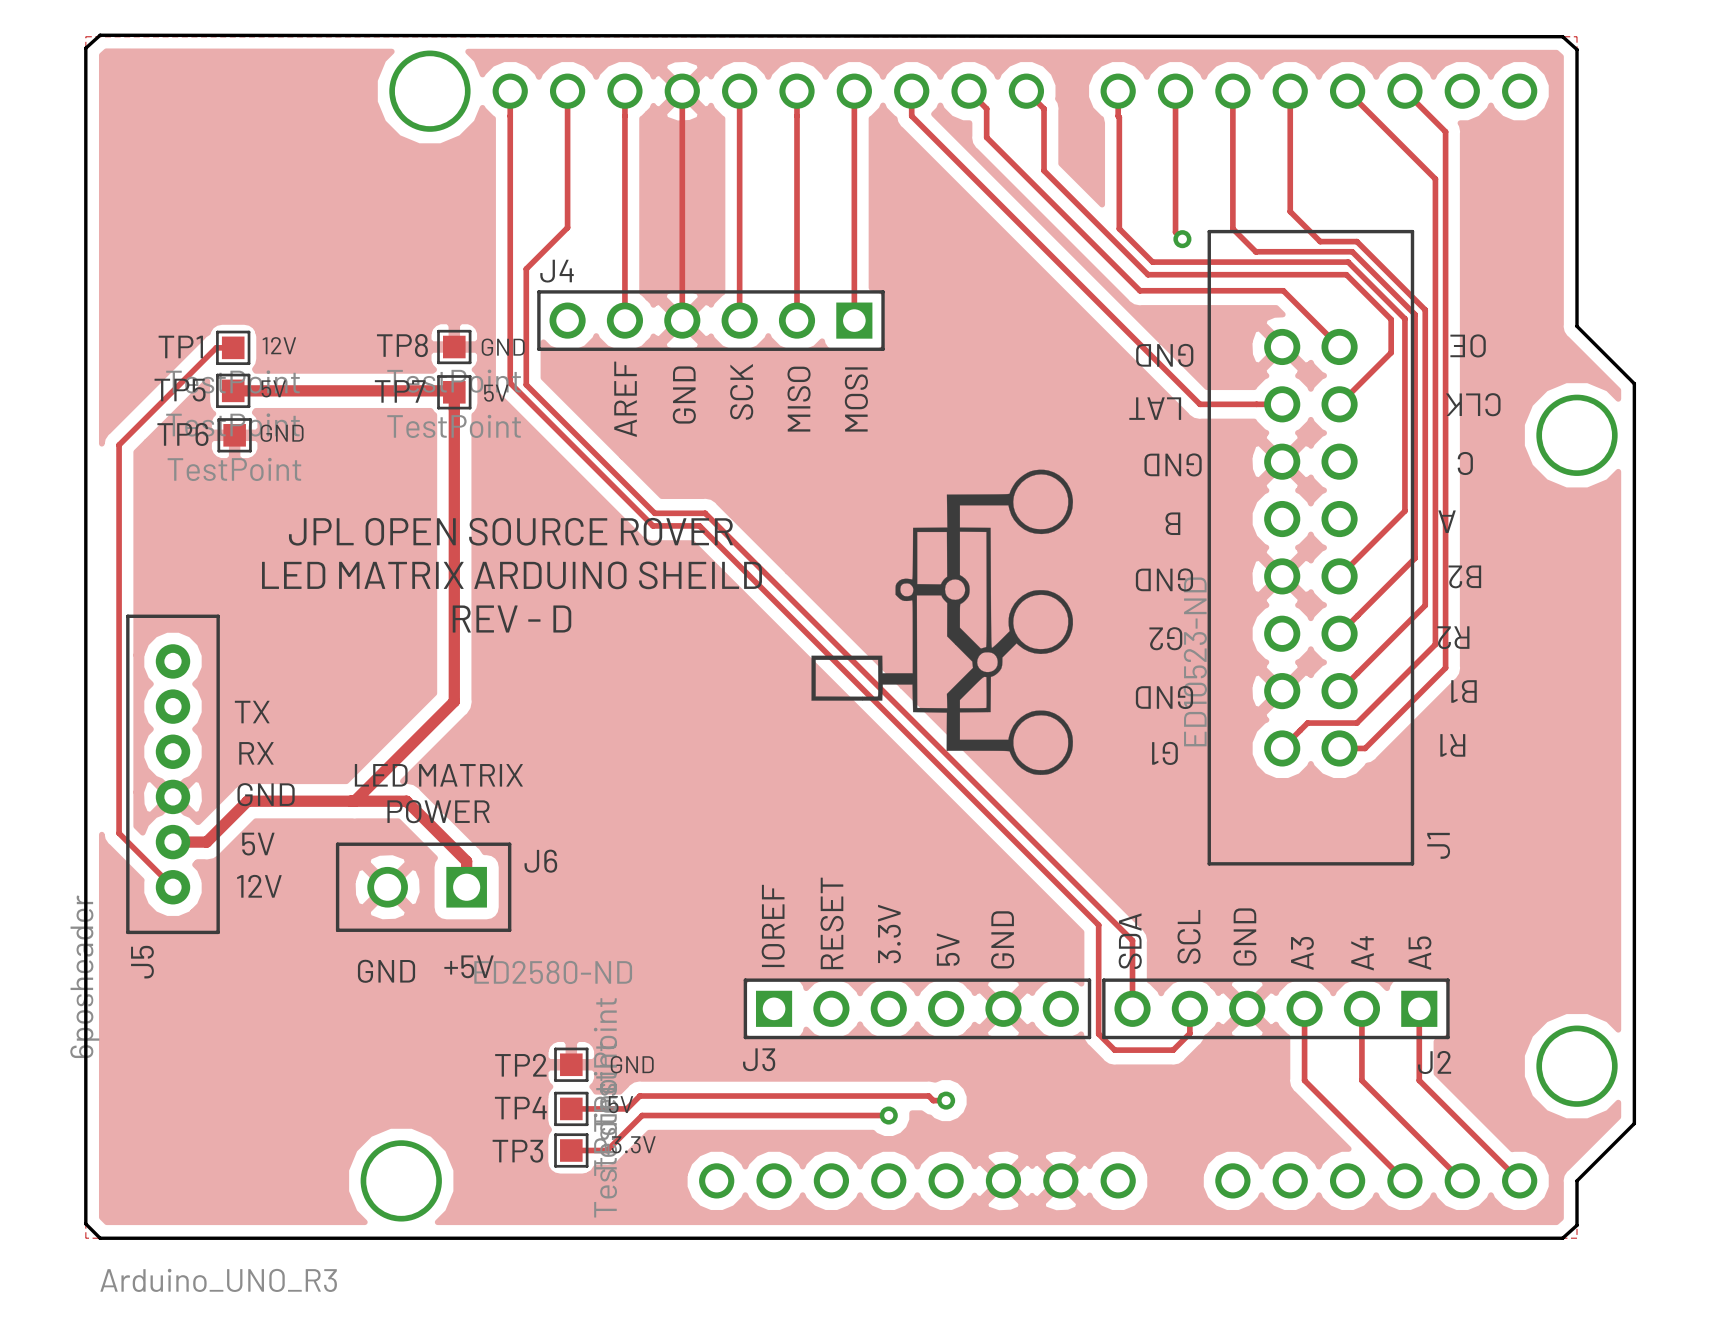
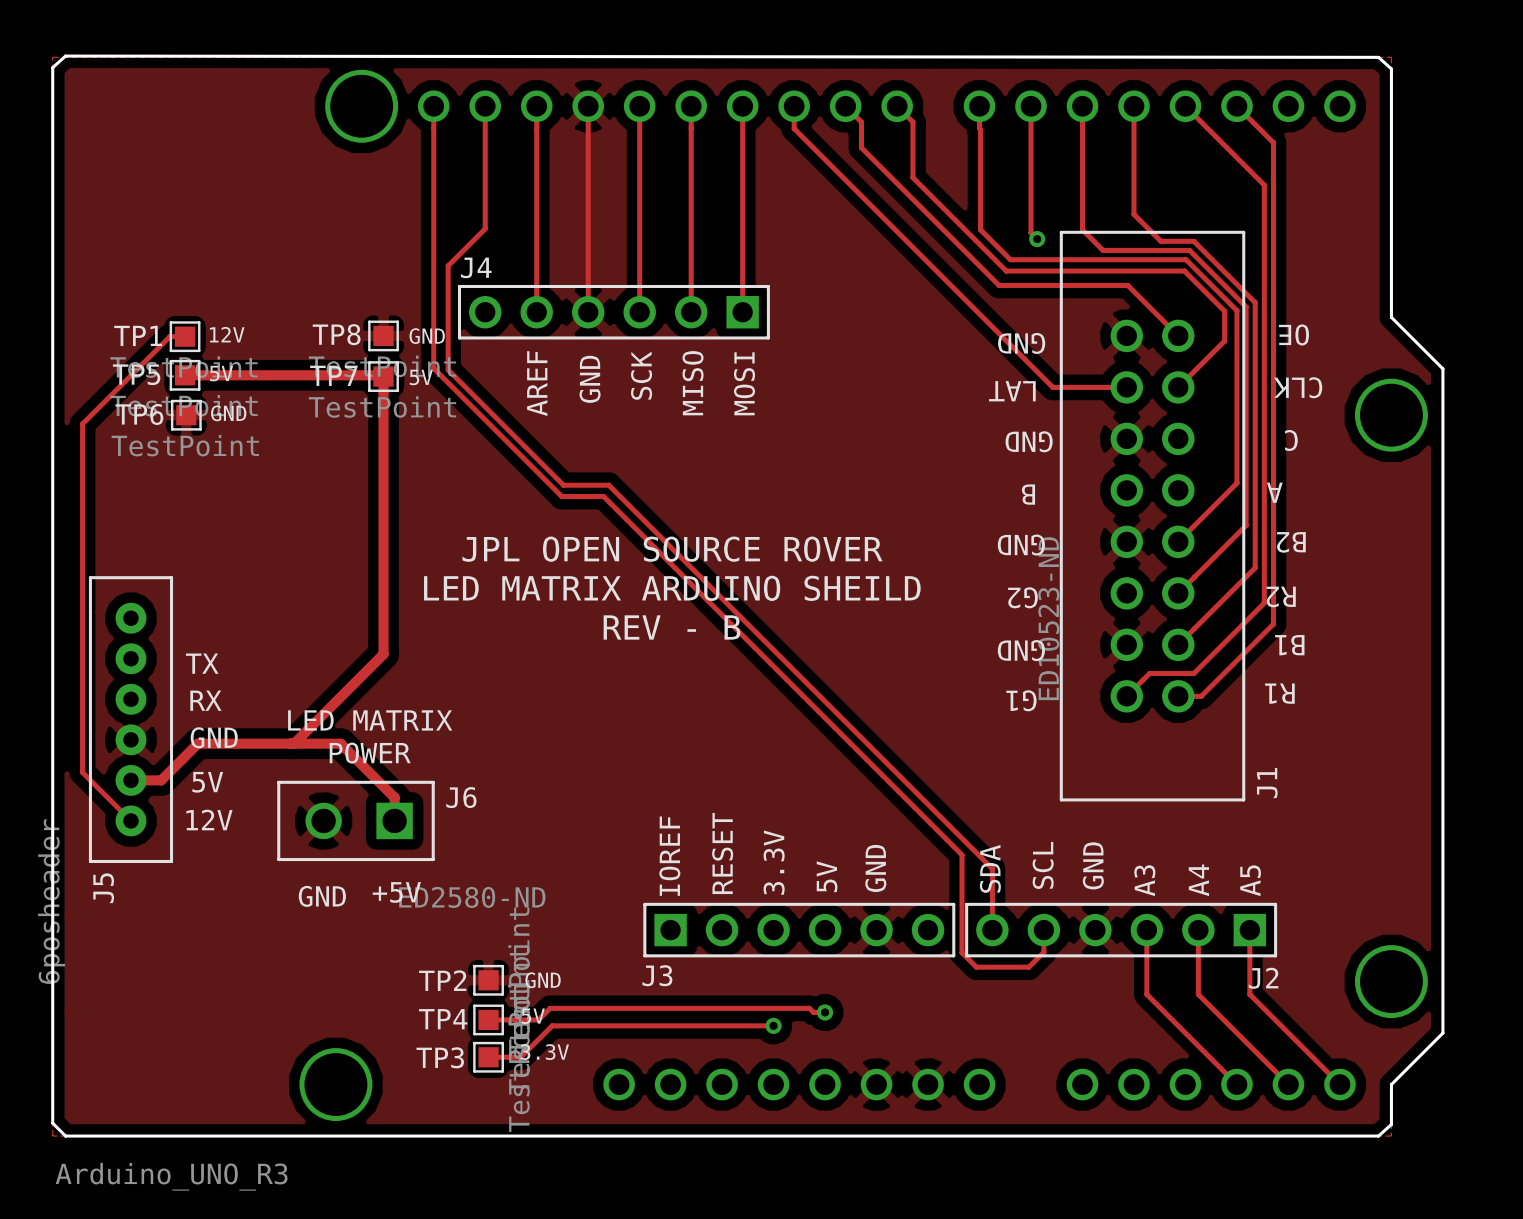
drawing: [811, 469, 1073, 775] -> none
text position: JPL OPEN SOURCE ROVER (510, 531) -> JPL OPEN SOURCE ROVER (672, 549)
text position: LED MATRIX ARDUINO SHEILD (512, 575) -> LED MATRIX ARDUINO SHEILD (672, 588)
text: REV - D (512, 619) -> none
text: none -> REV - B (672, 627)

